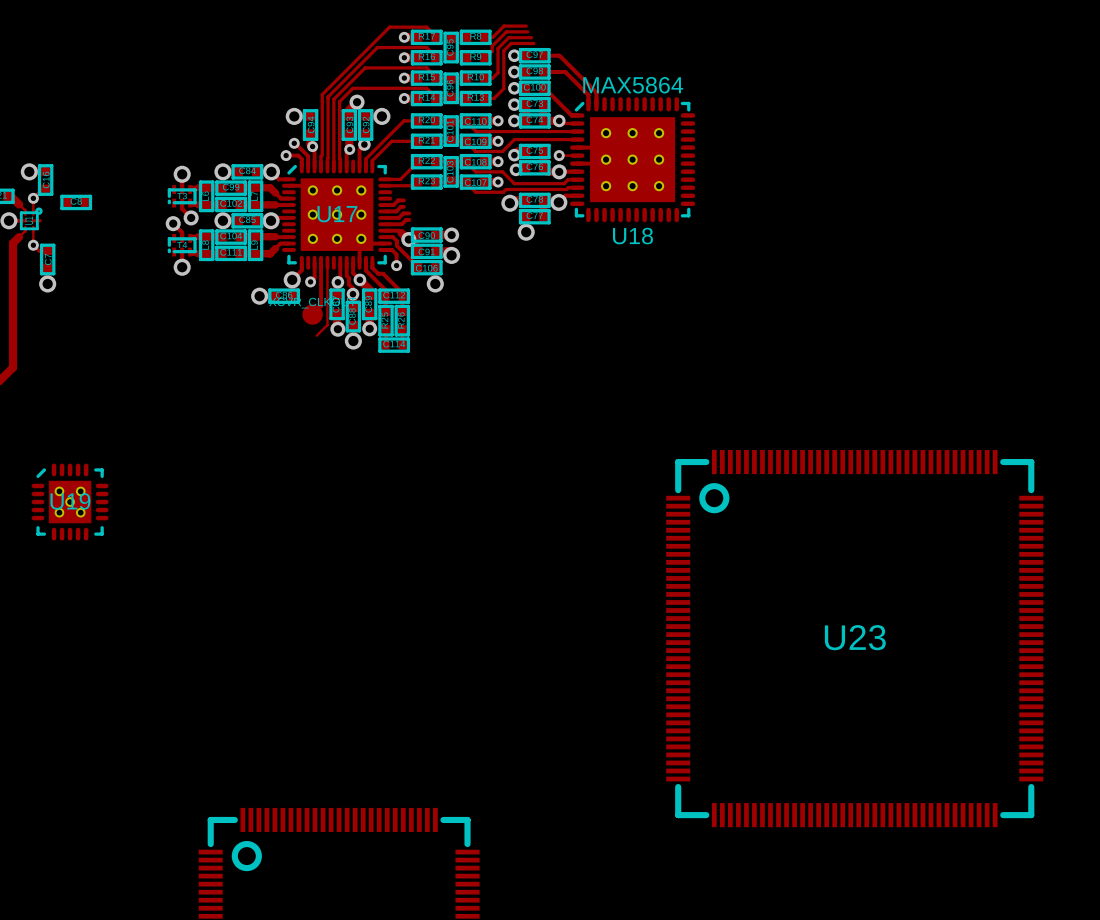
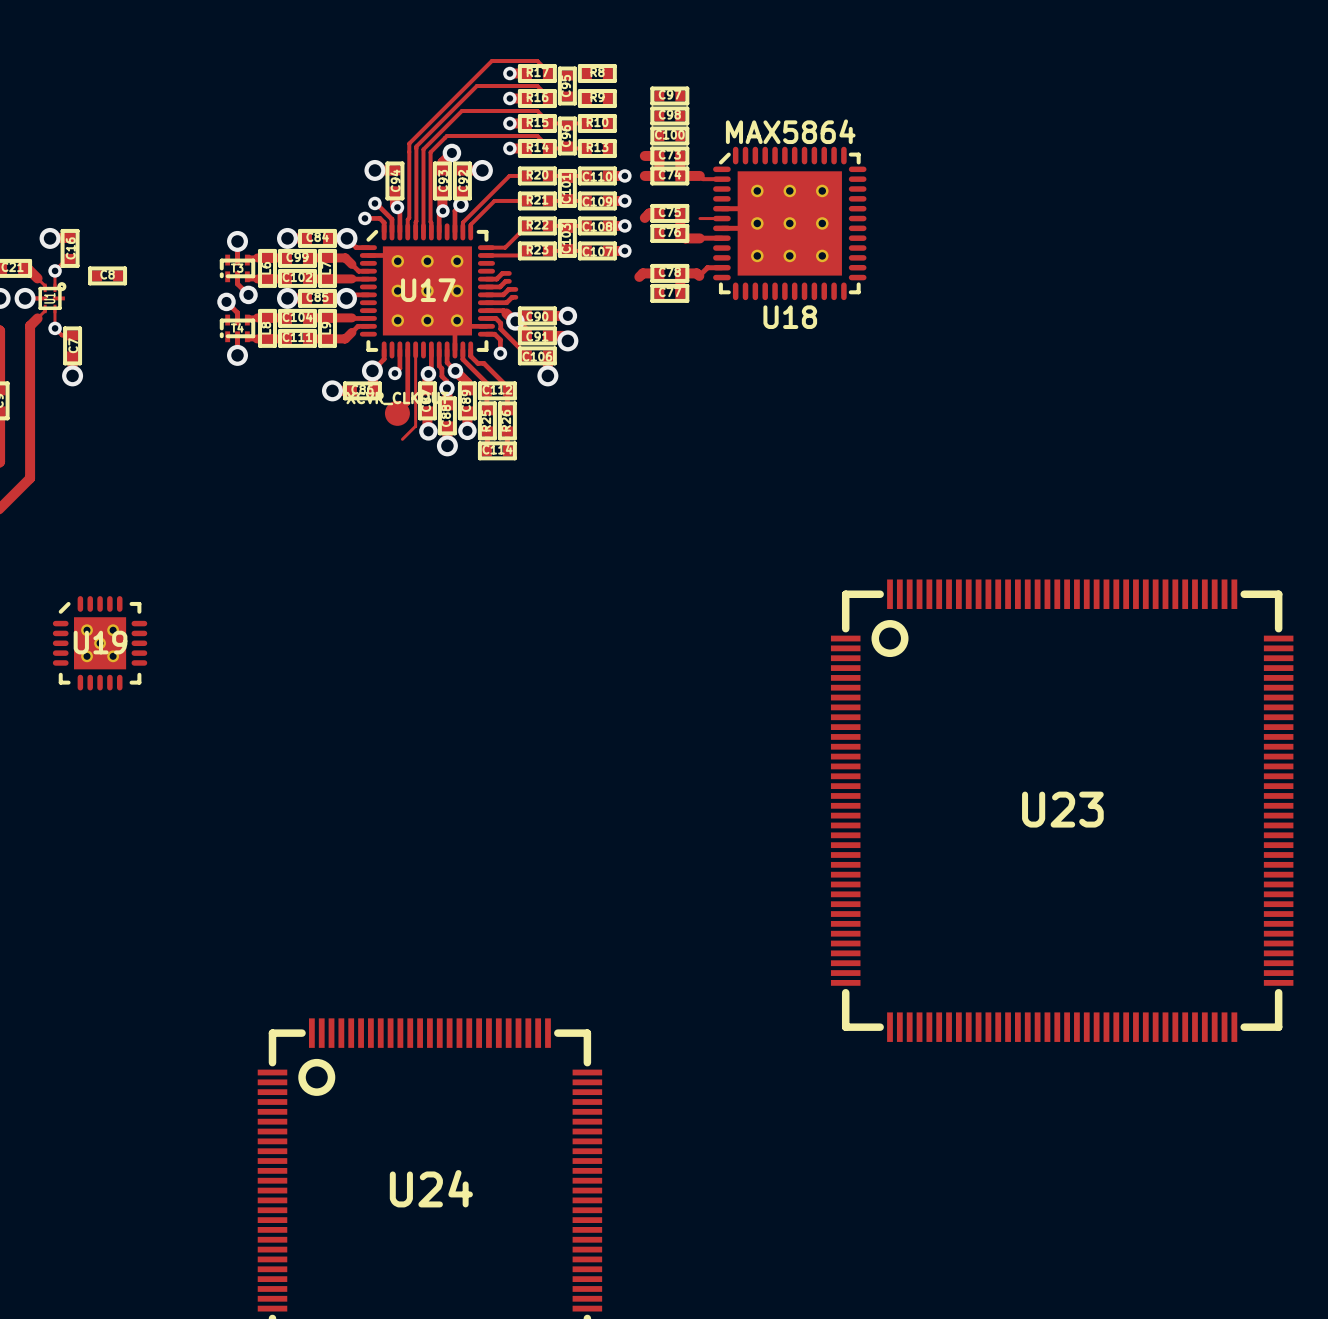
track: (526, 26) (504, 26) (492, 37) (484, 37) -> none
track: (527, 31) (506, 31) (492, 46) (492, 51) (484, 57) -> none
track: (531, 37) (508, 37) (498, 48) (498, 72) (492, 78) (484, 78) -> none
track: (533, 43) (511, 43) (503, 50) (503, 88) (494, 98) (484, 98) -> none
via: (514, 55) -> none
track: (543, 55) (559, 55) (596, 92) (596, 104) -> none
via: (514, 72) -> none
track: (543, 72) (565, 72) (588, 95) (588, 104) -> none
via: (514, 88) -> none
track: (543, 88) (571, 115) (577, 115) -> none
via: (514, 104) -> none
track: (467, 120) (476, 131) (577, 131) -> none
via: (514, 120) -> none
via: (559, 120) -> none
track: (577, 139) (514, 139) (502, 151) (475, 151) (467, 141) -> none
via: (514, 155) -> none
via: (559, 155) -> none
track: (467, 161) (475, 171) (502, 171) (514, 183) (564, 183) (568, 179) (577, 179) -> none
via: (516, 169) -> none
via: (559, 171) -> none
track: (467, 182) (475, 192) (577, 187) -> none
via: (558, 202) -> none
via: (509, 203) -> none
via: (526, 232) -> none

